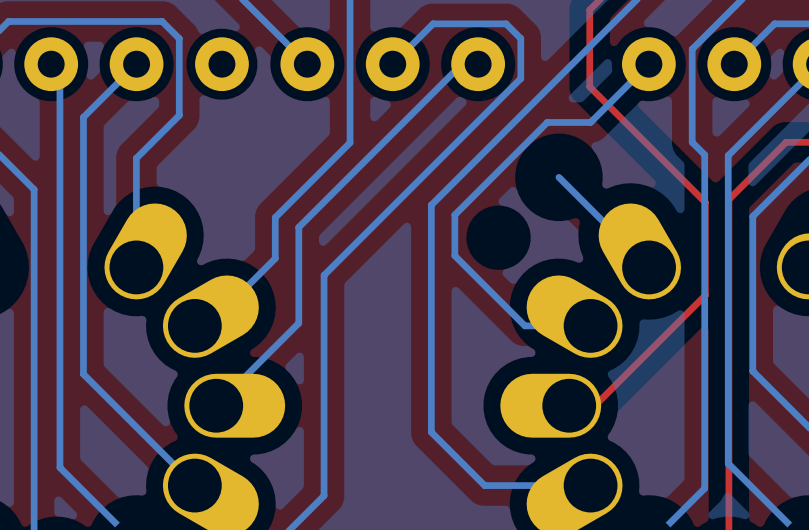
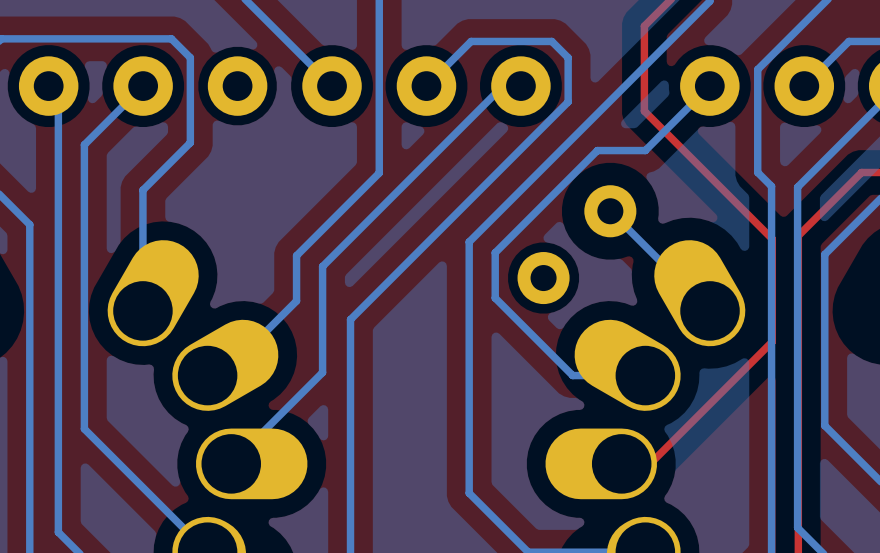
part: none -> (576, 244)

